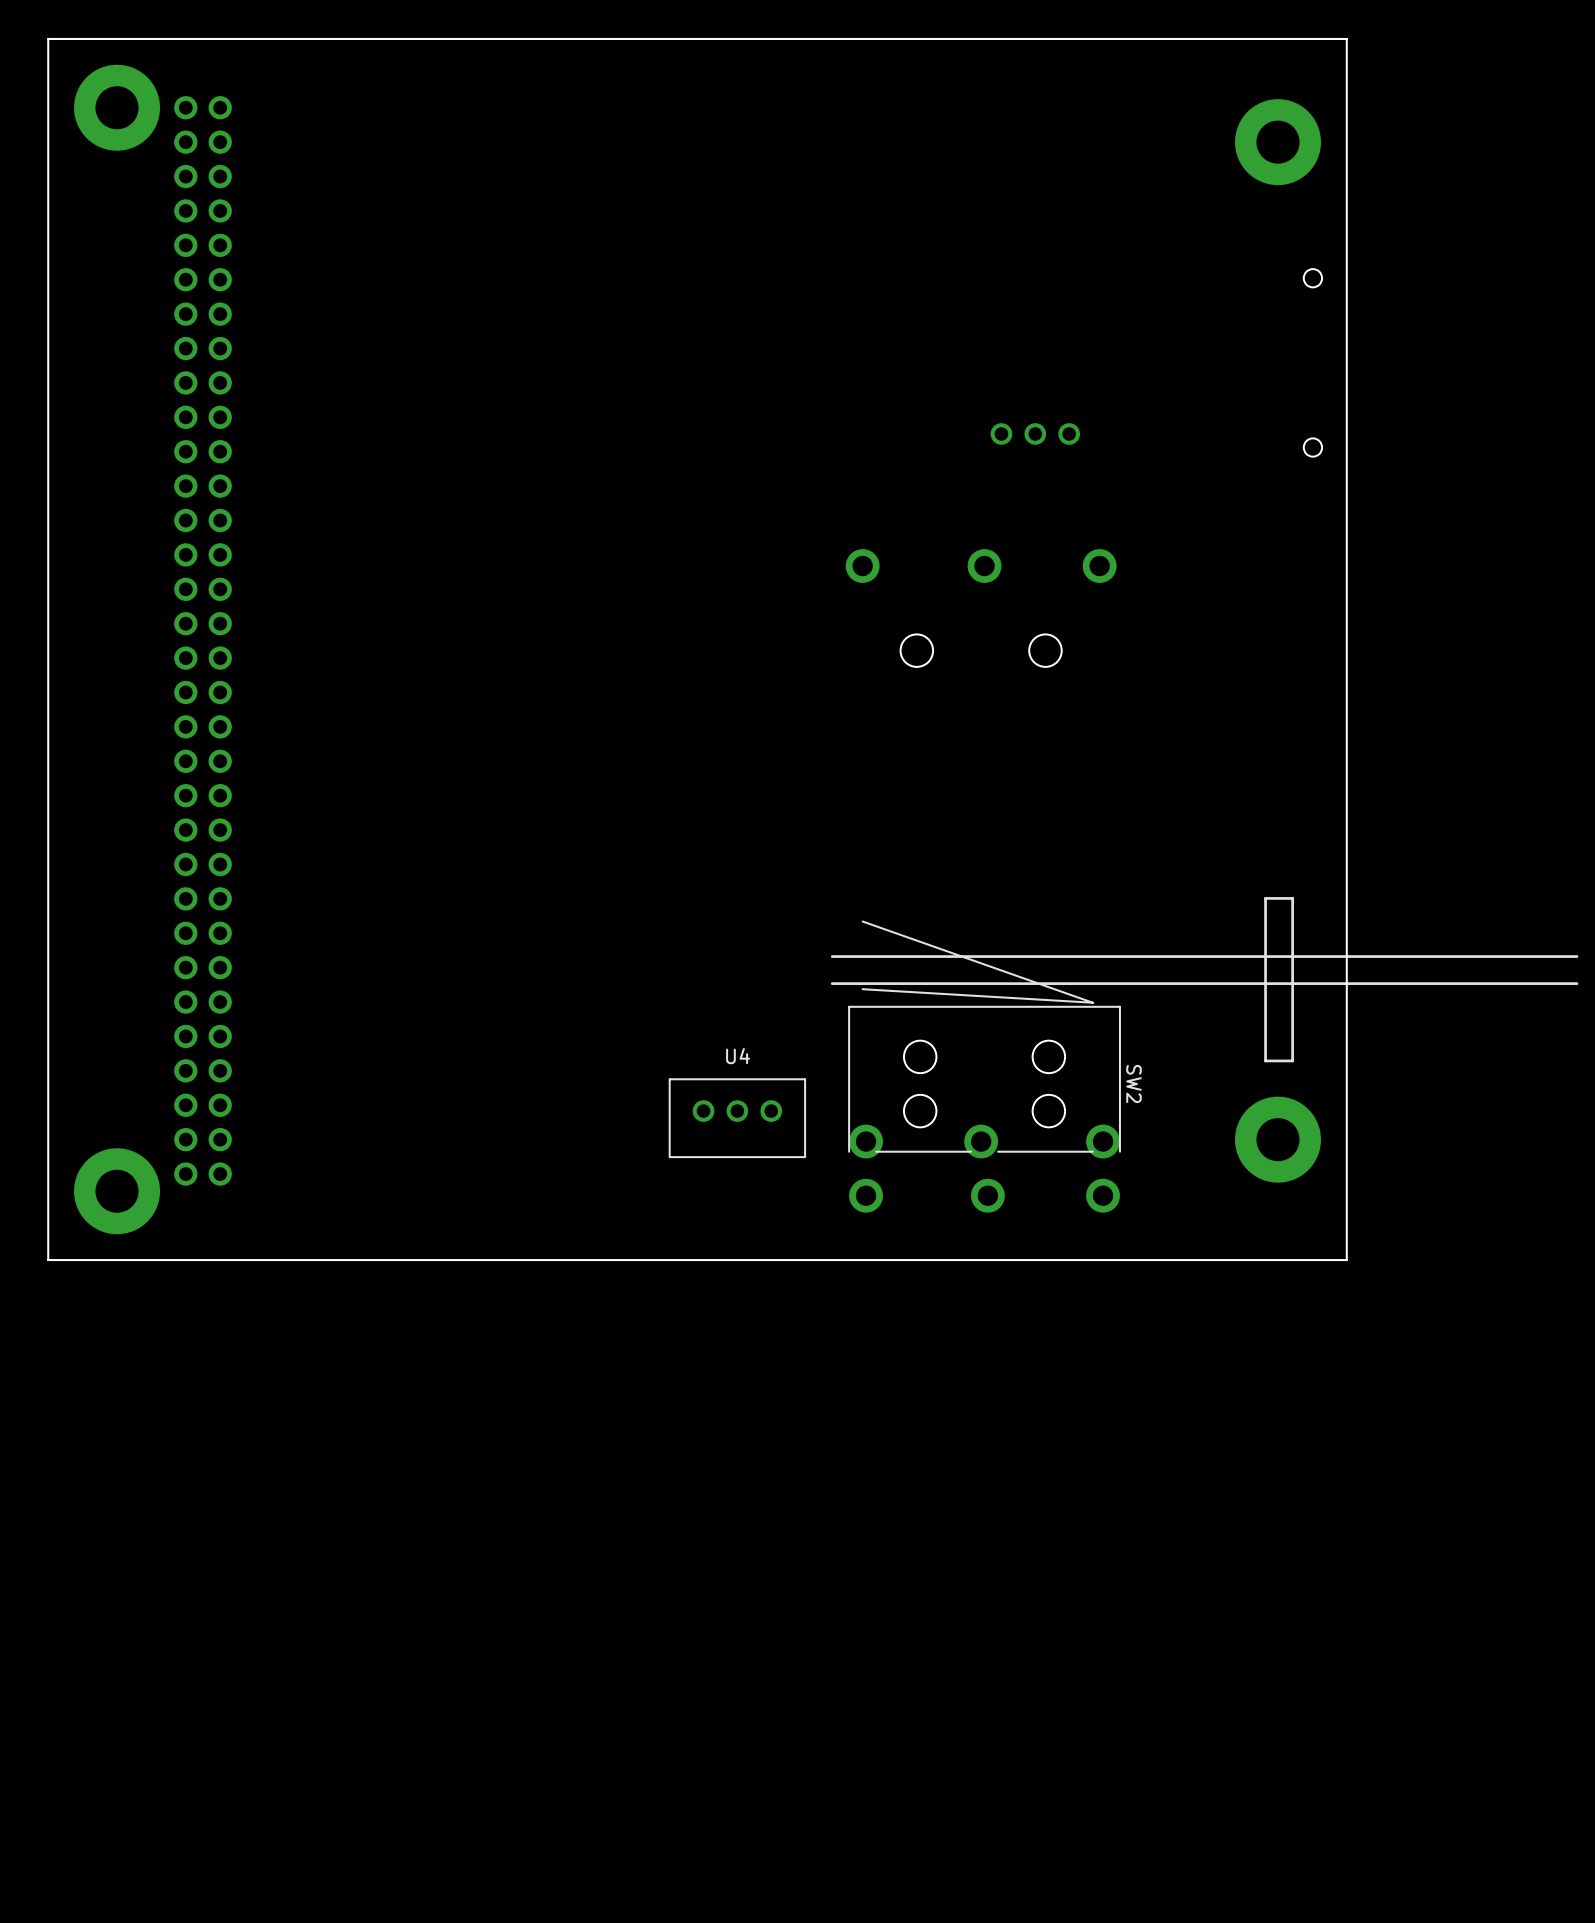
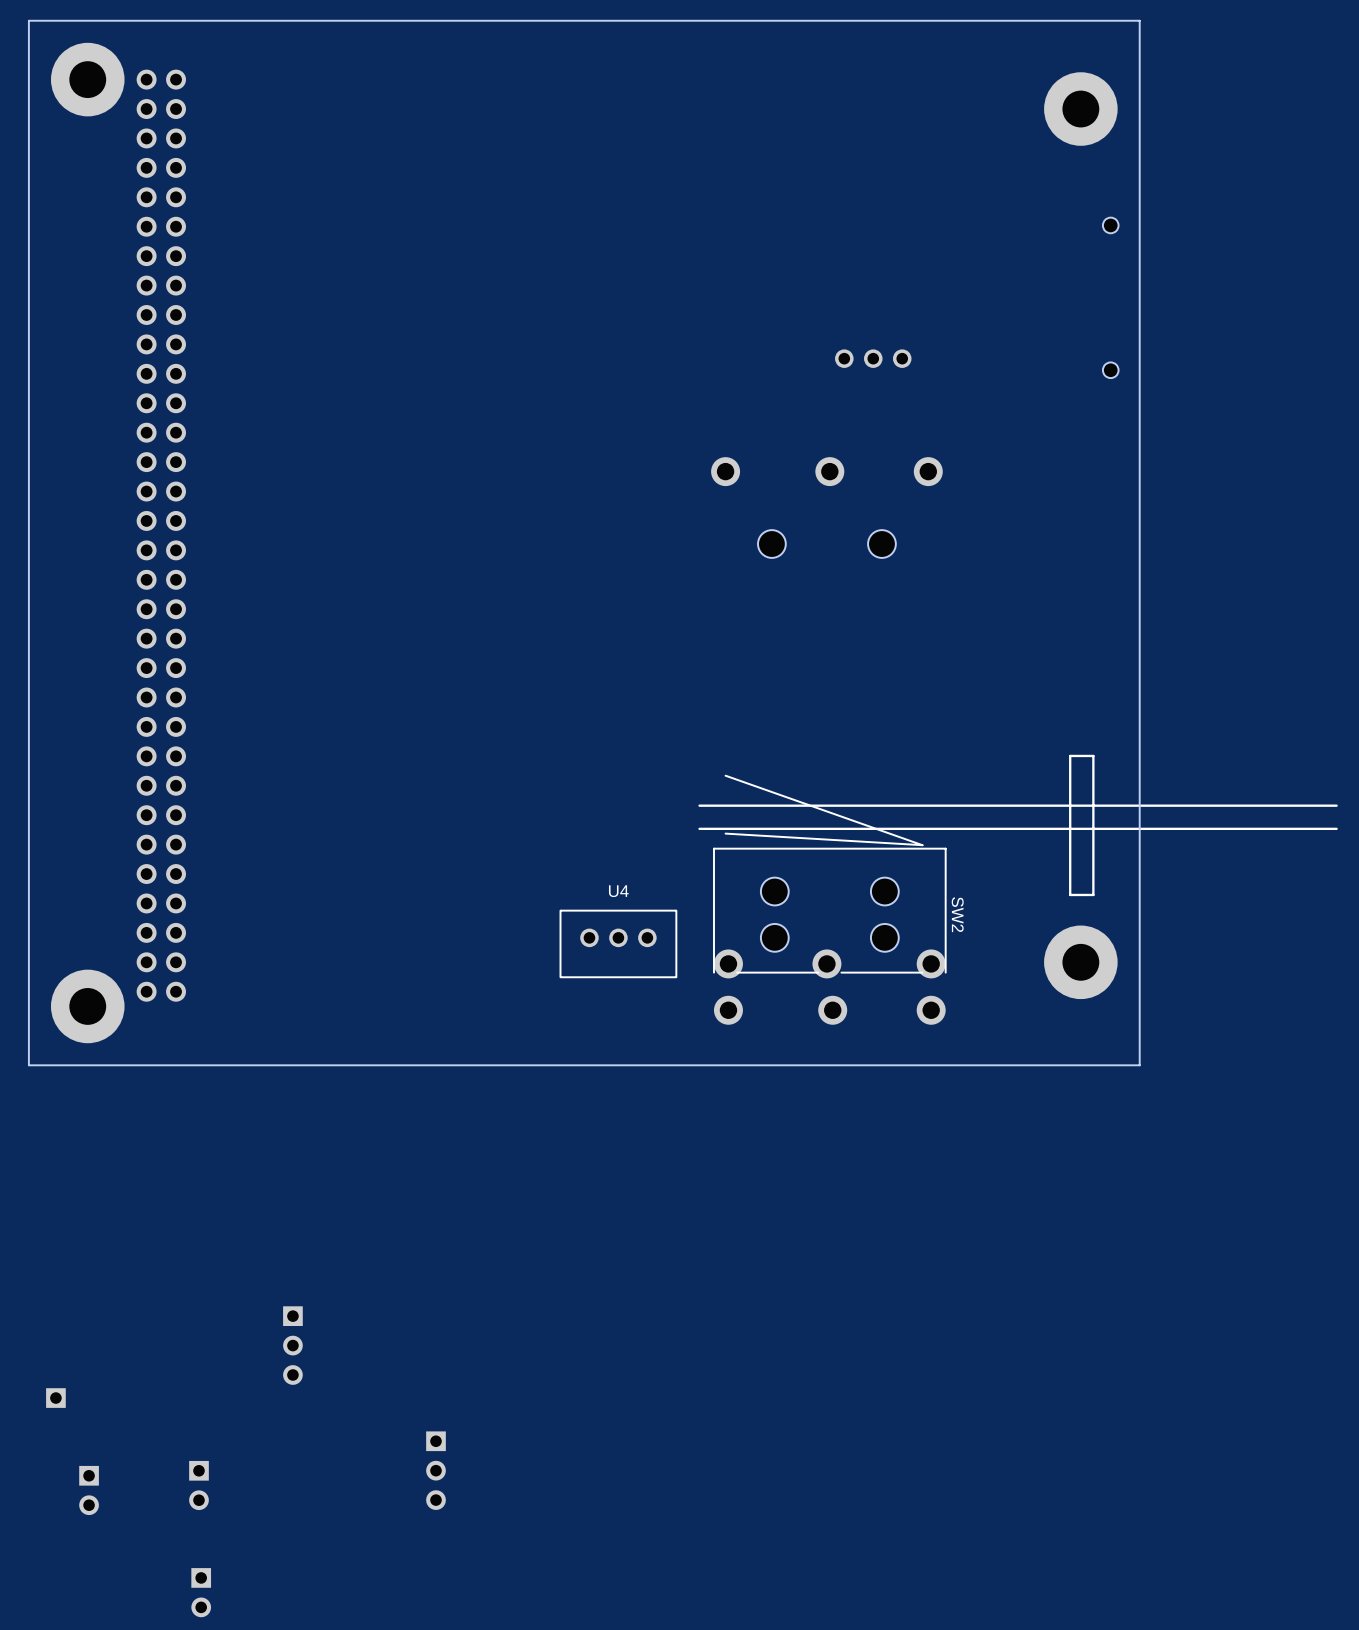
part: none -> (292, 1345)
part: none -> (55, 1398)
part: none -> (436, 1470)
part: none -> (198, 1485)
part: none -> (89, 1490)
part: none -> (201, 1592)

